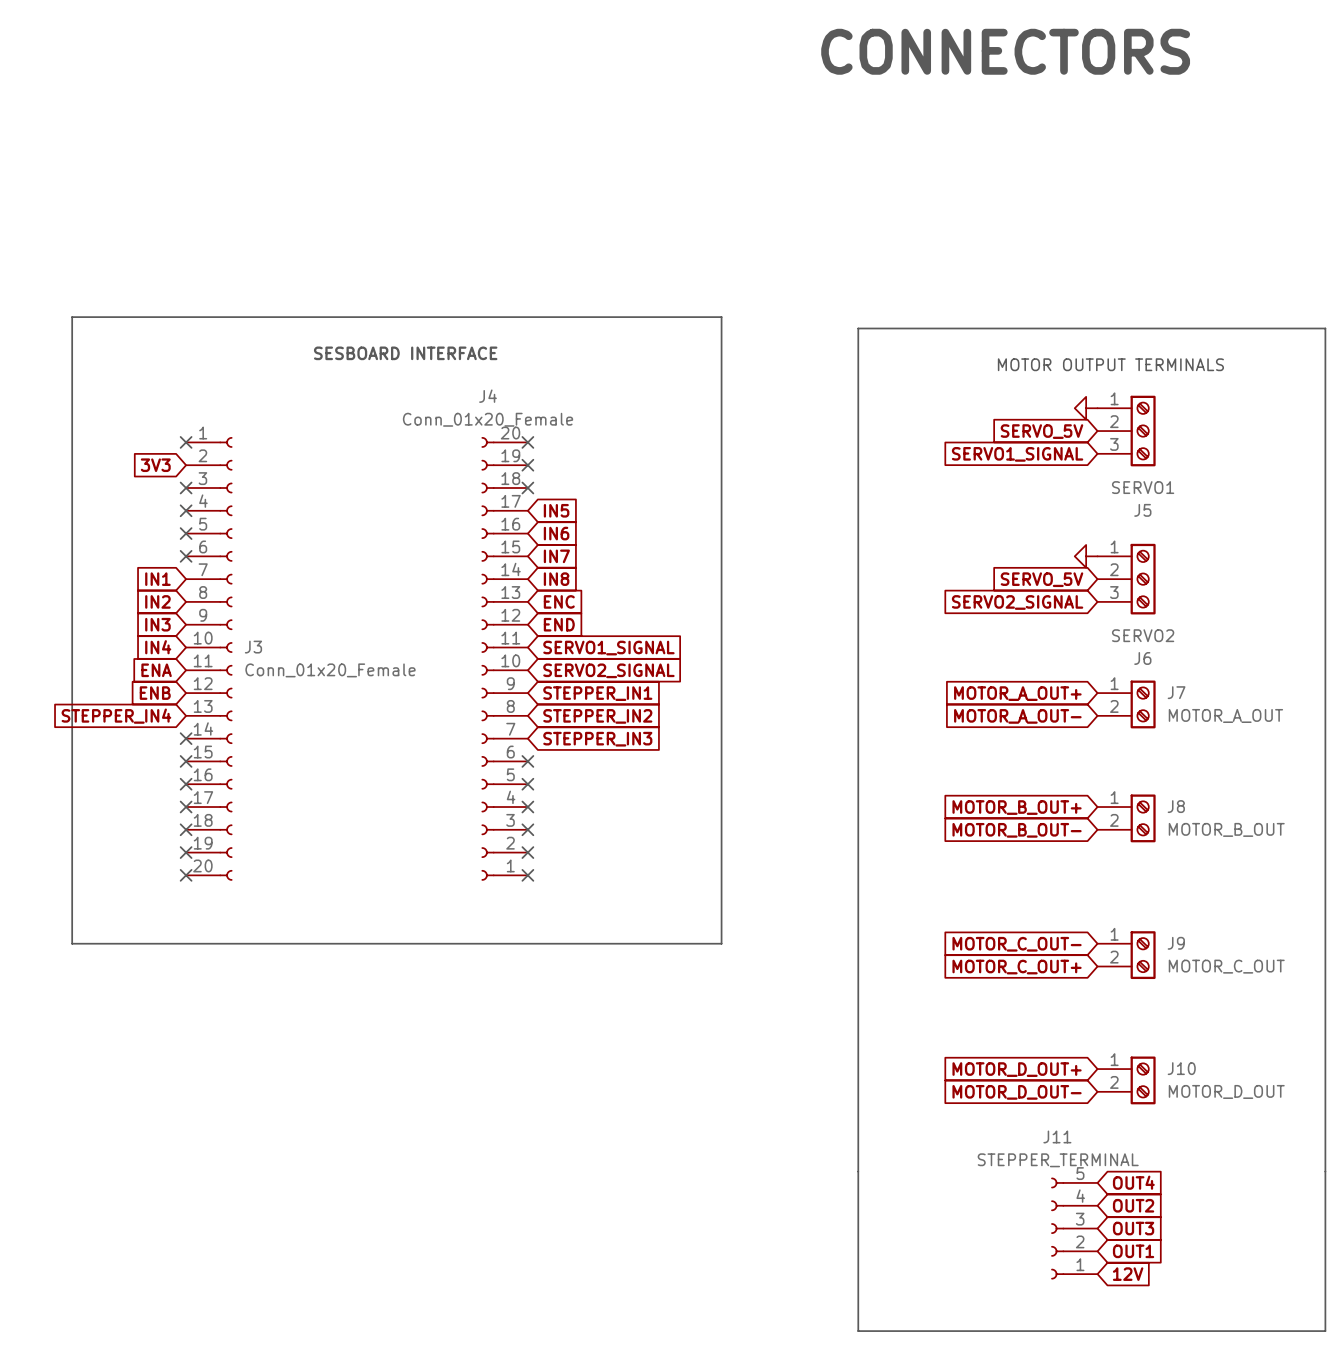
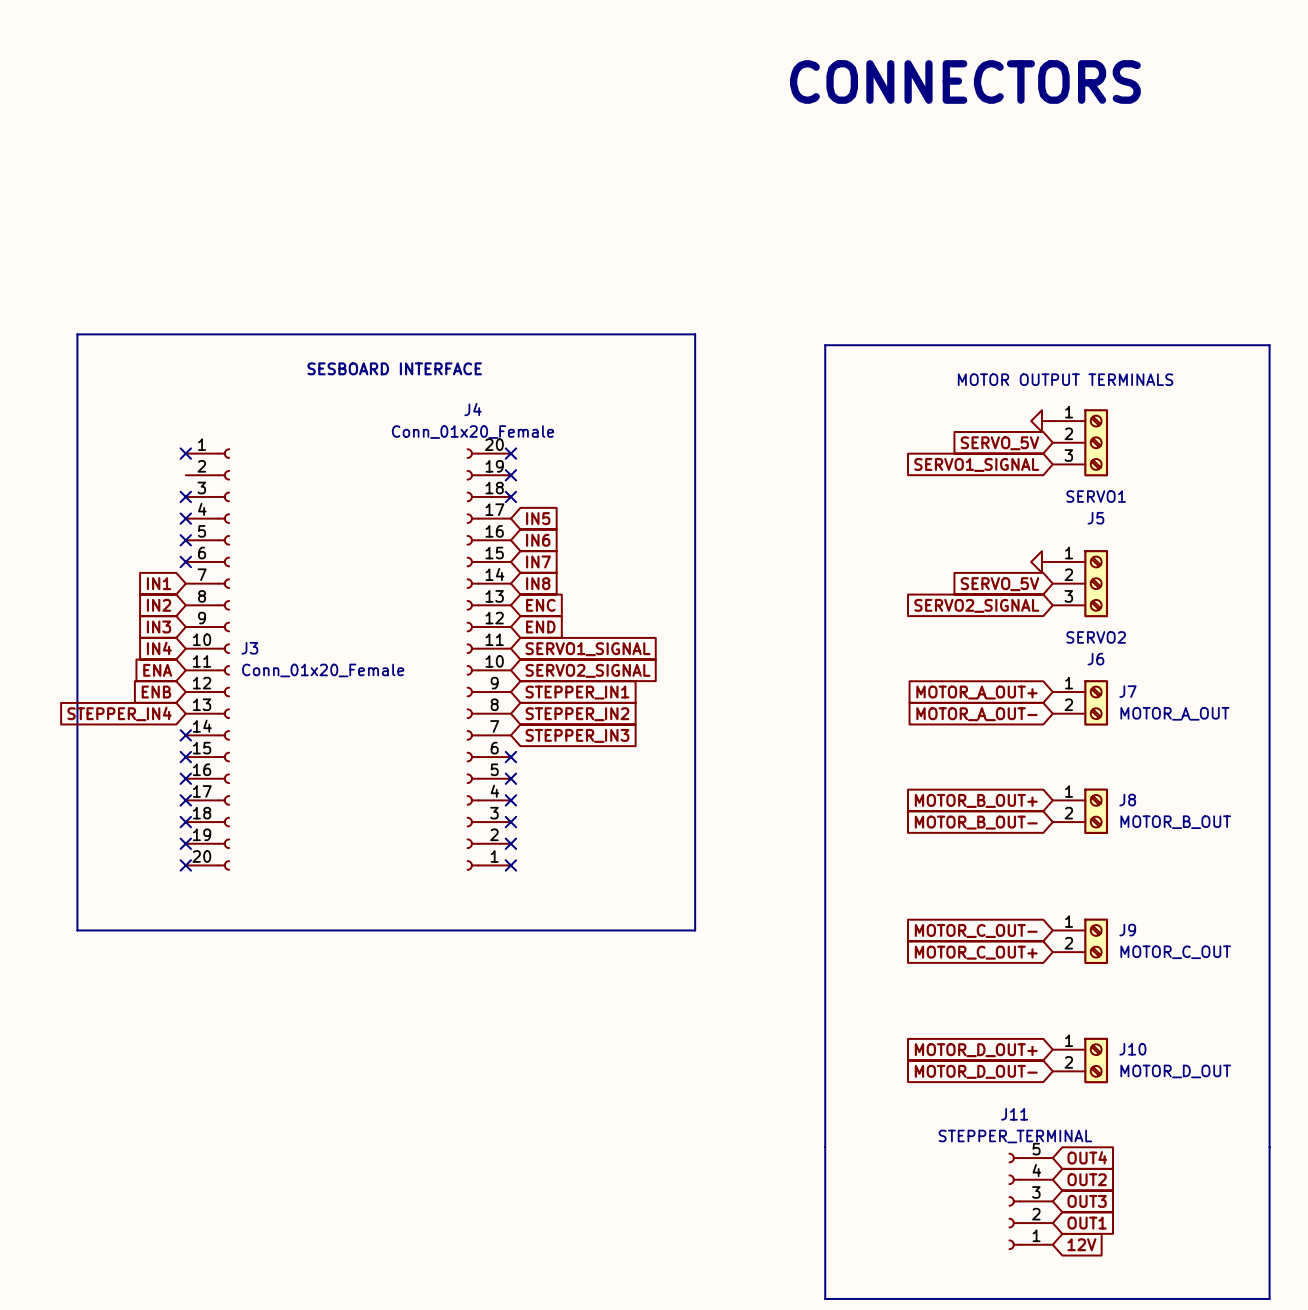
global label: 3V3 (155, 465) -> none

